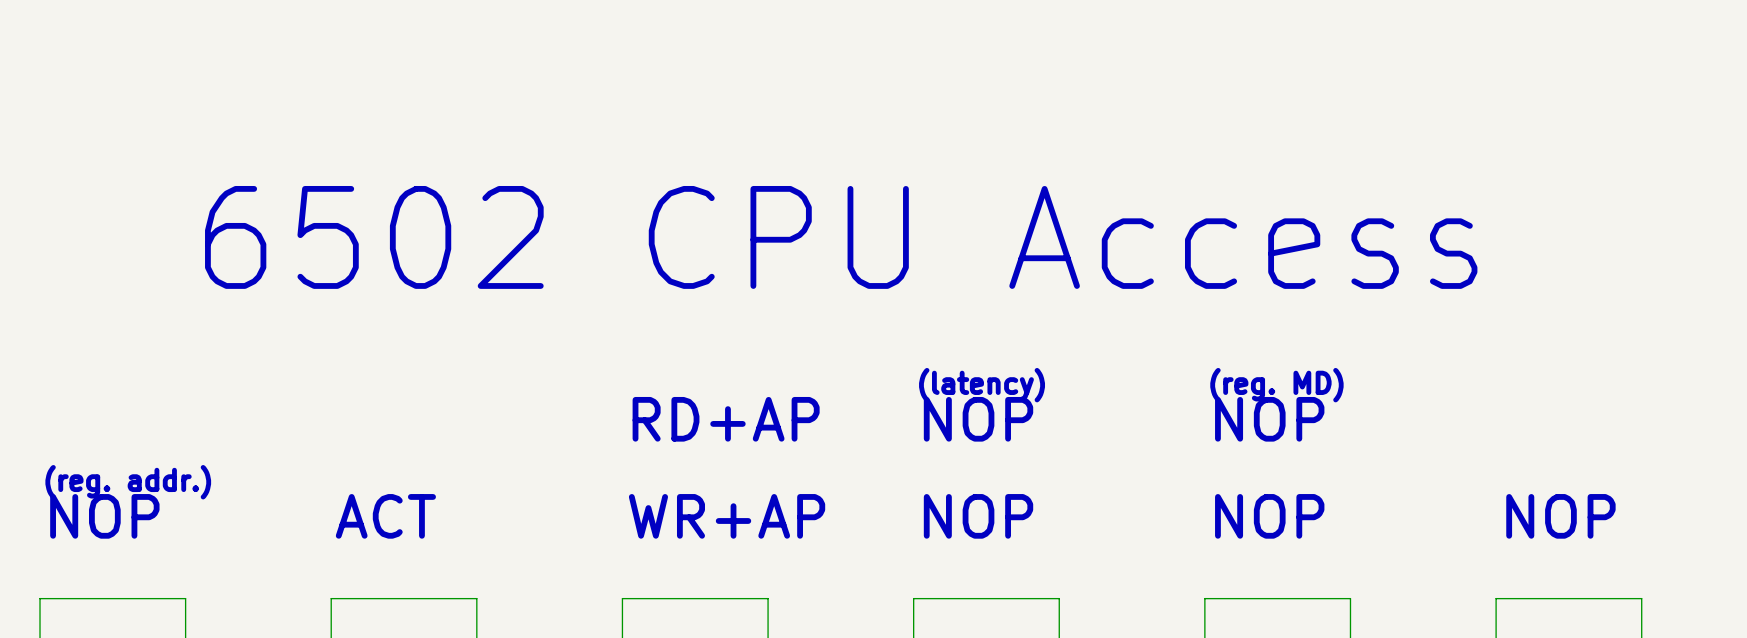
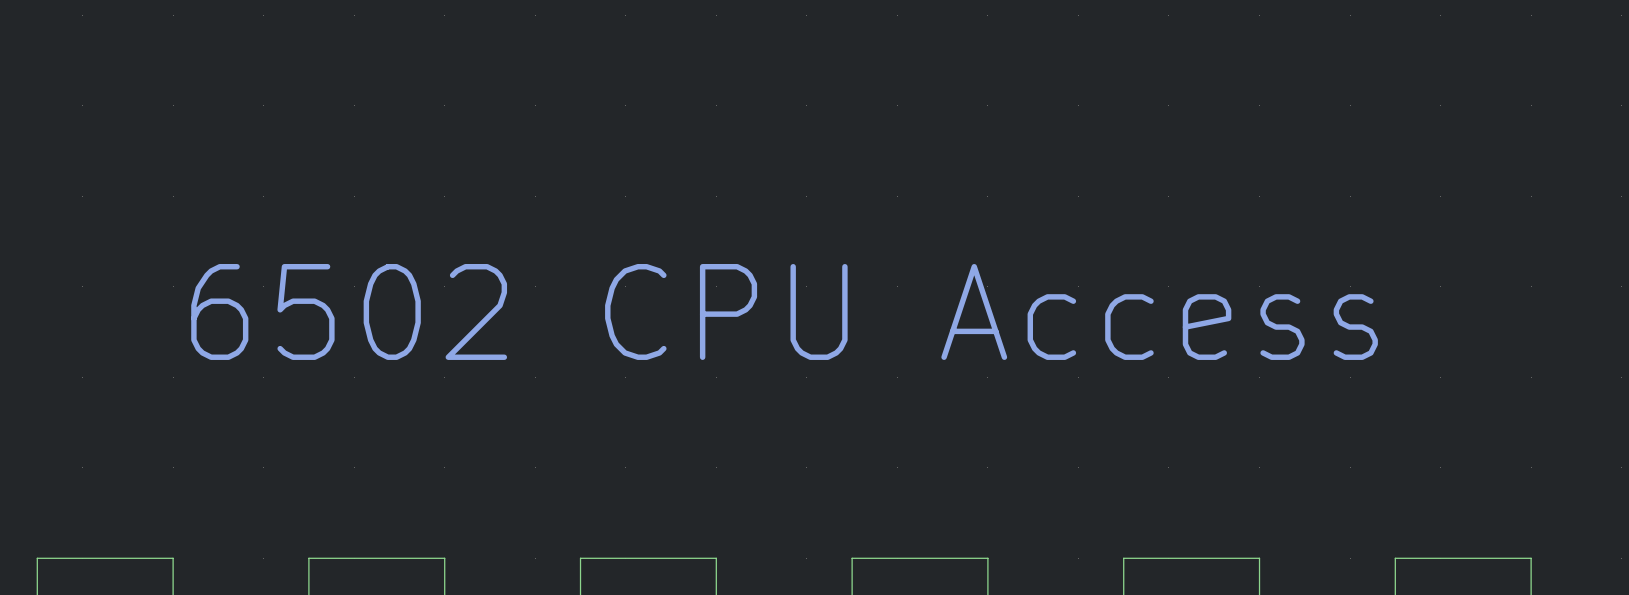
text position: 6502 CPU Access (841, 237) -> 6502 CPU Access (784, 311)
text: (latency) (982, 385) -> none
text: (reg. MD) (1276, 385) -> none
text: RD+AP (726, 419) -> none
text: NOP (978, 419) -> none
text: NOP (1269, 419) -> none
text: (reg. addr.) (128, 482) -> none
text: NOP (104, 516) -> none
text: ACT (385, 516) -> none
text: WR+AP (727, 516) -> none
text: NOP (978, 516) -> none
text: NOP (1269, 516) -> none
text: NOP (1560, 516) -> none

